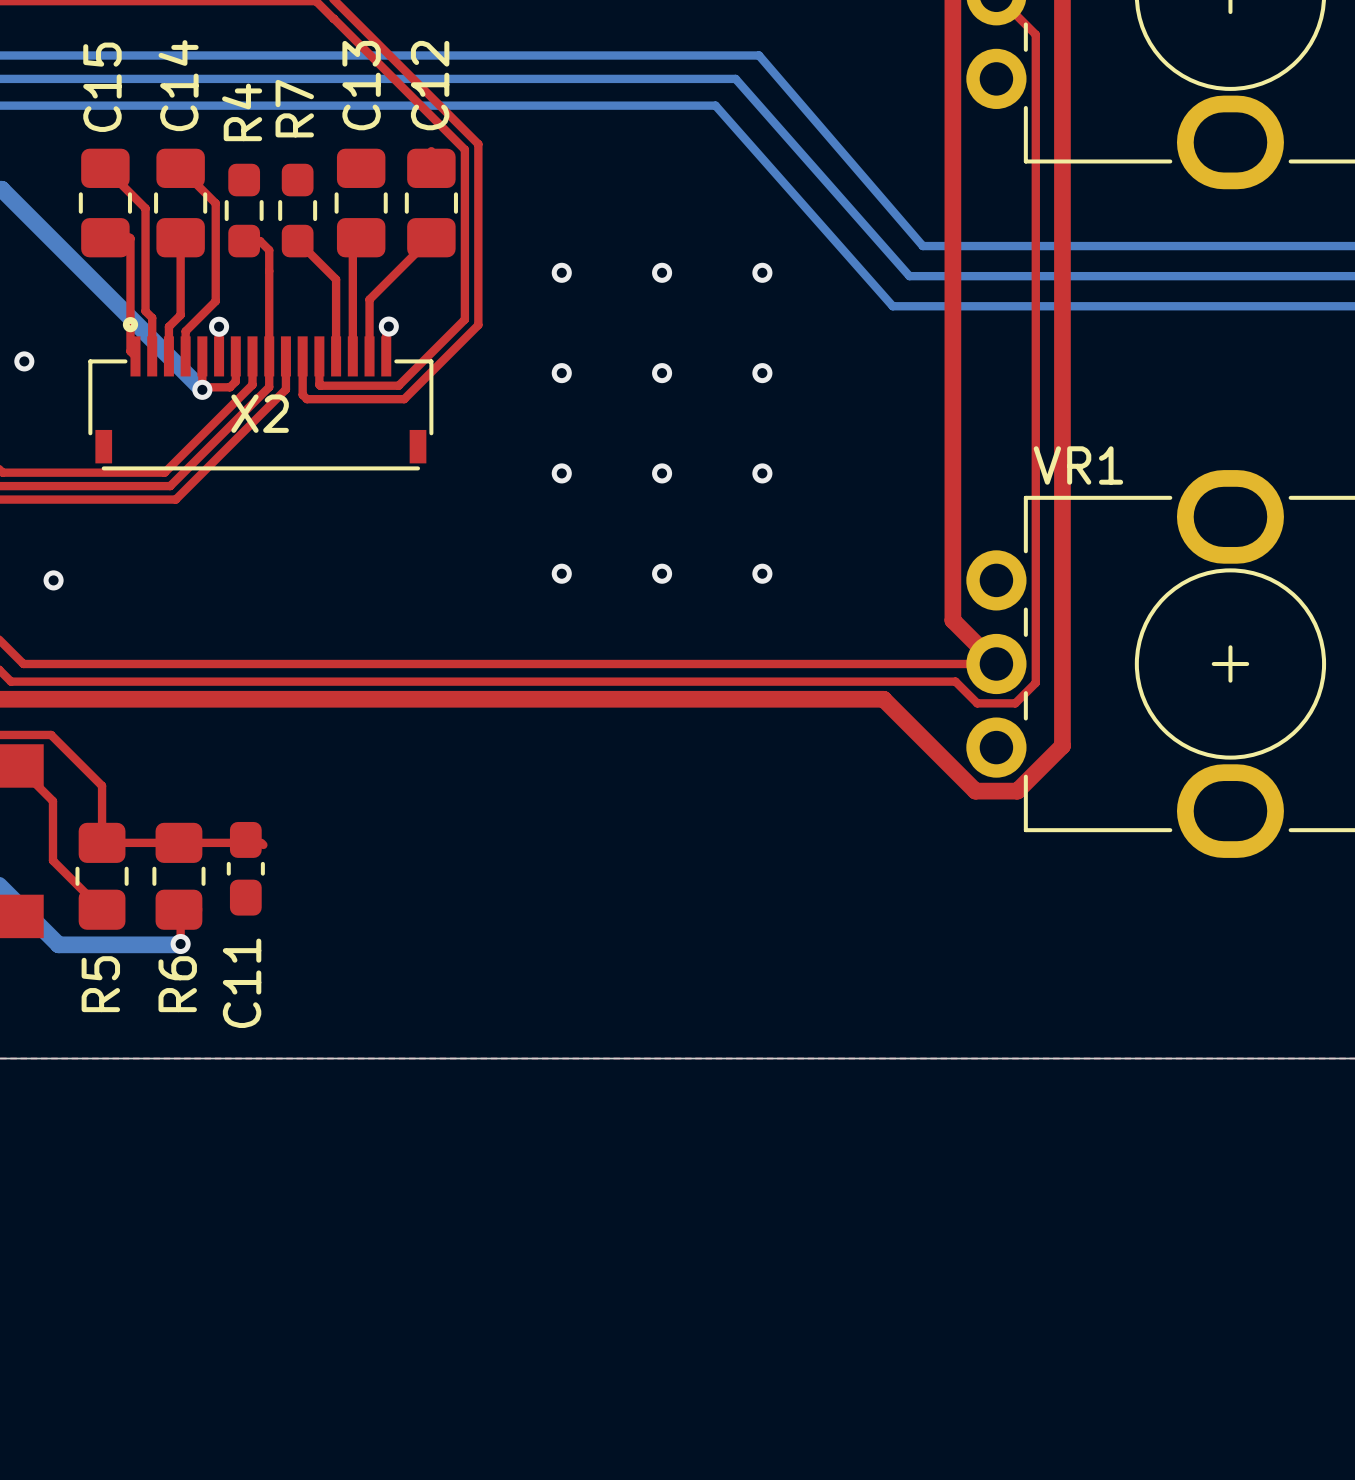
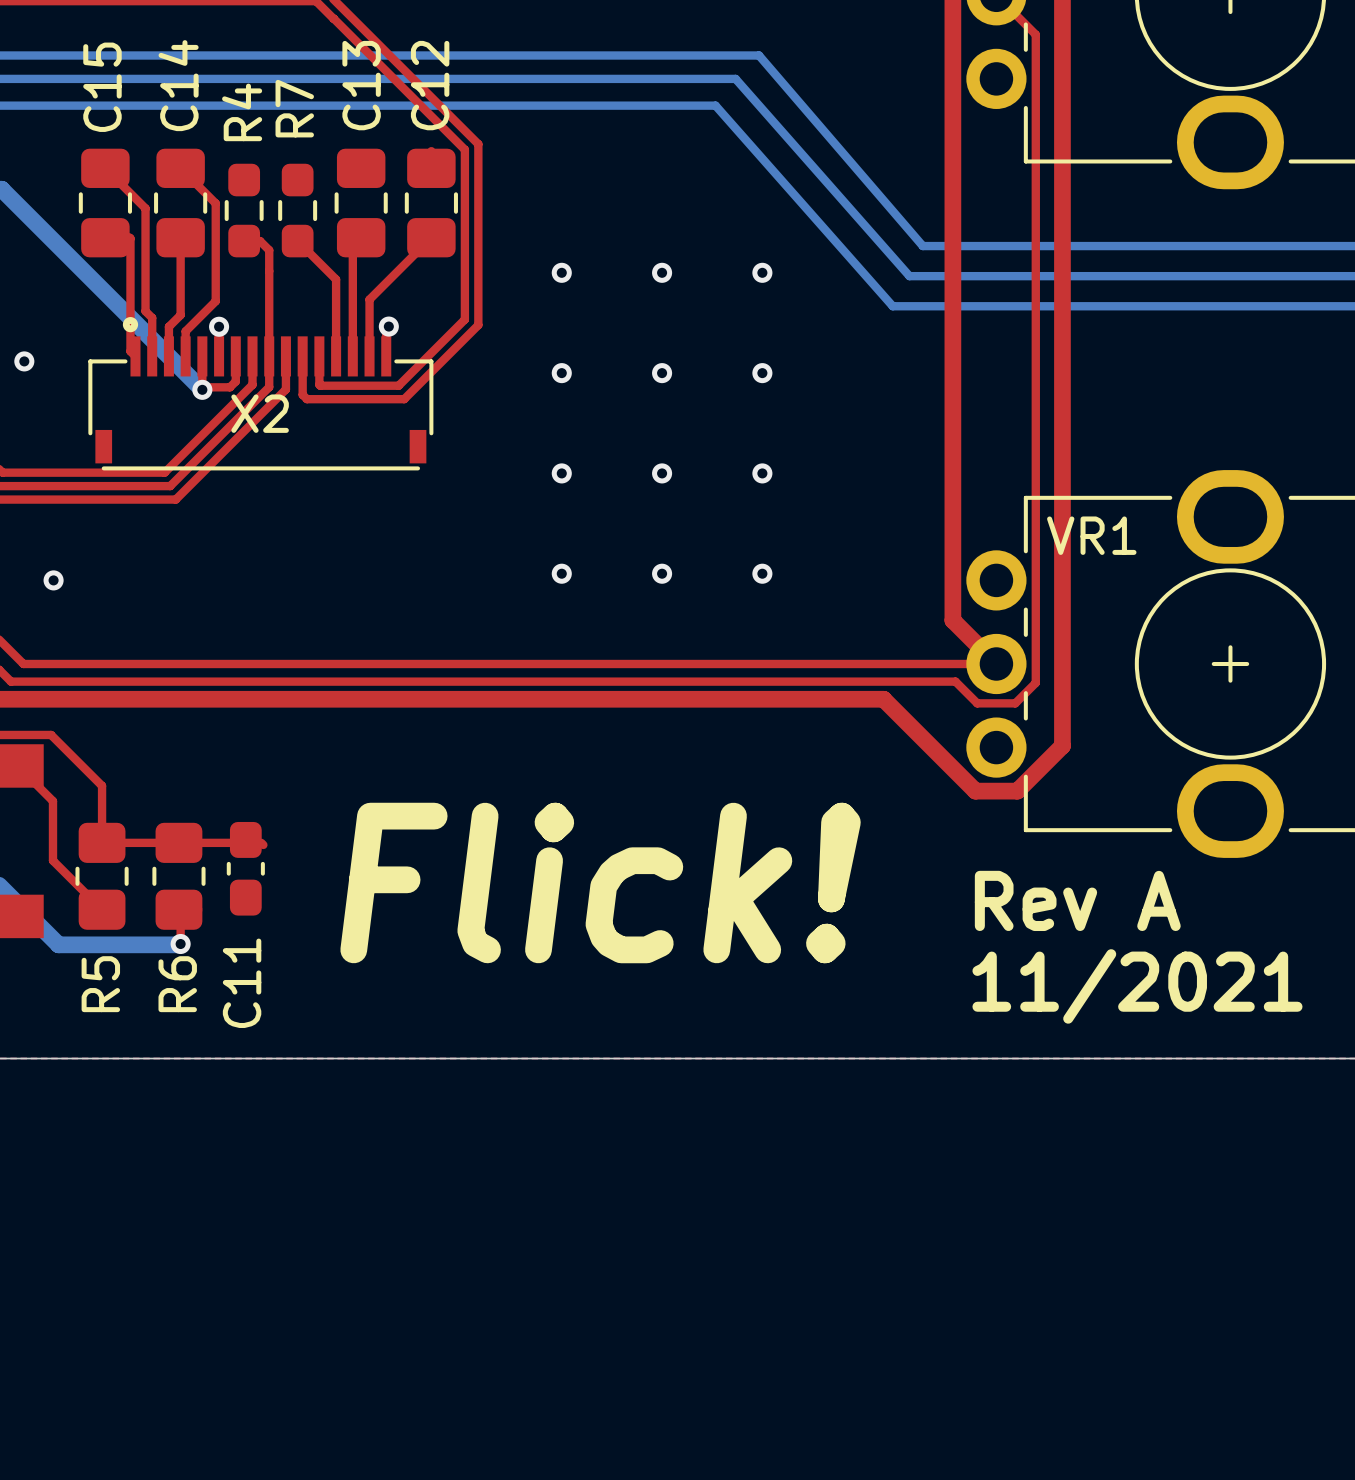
VR1 name position: VR1 (1078, 465) -> VR1 (1091, 535)
text: none -> Flick! (600, 883)
text: none -> Rev A (1077, 900)
text: none -> 11/2021 (1137, 986)

